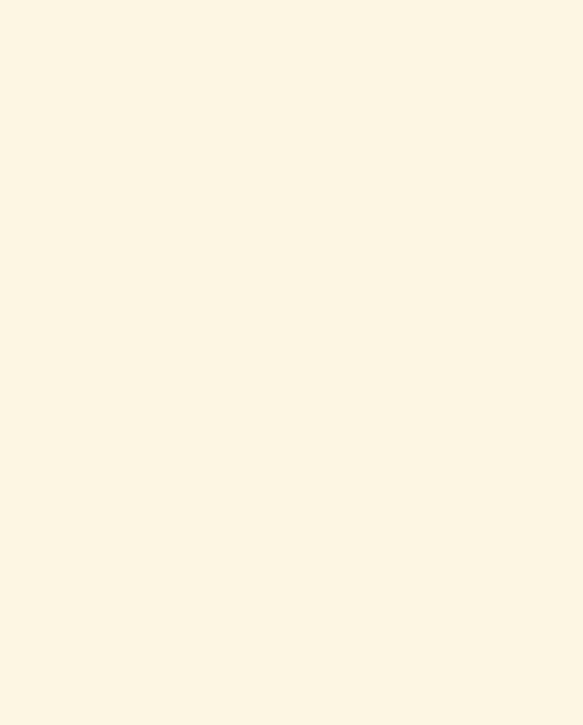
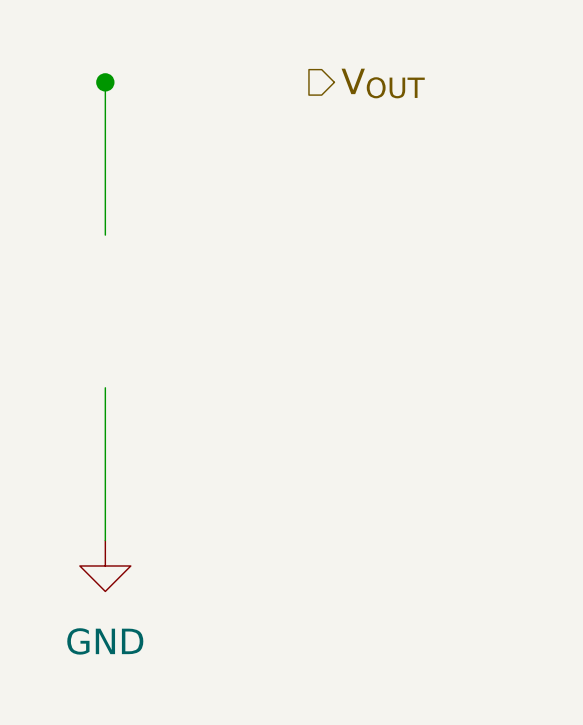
wire: none -> (105, 82) (105, 235)
junction: none -> (105, 82)
hierarchical label: none -> VOUT (383, 83)
wire: none -> (105, 387) (105, 540)
power symbol: none -> GND (105, 565)

